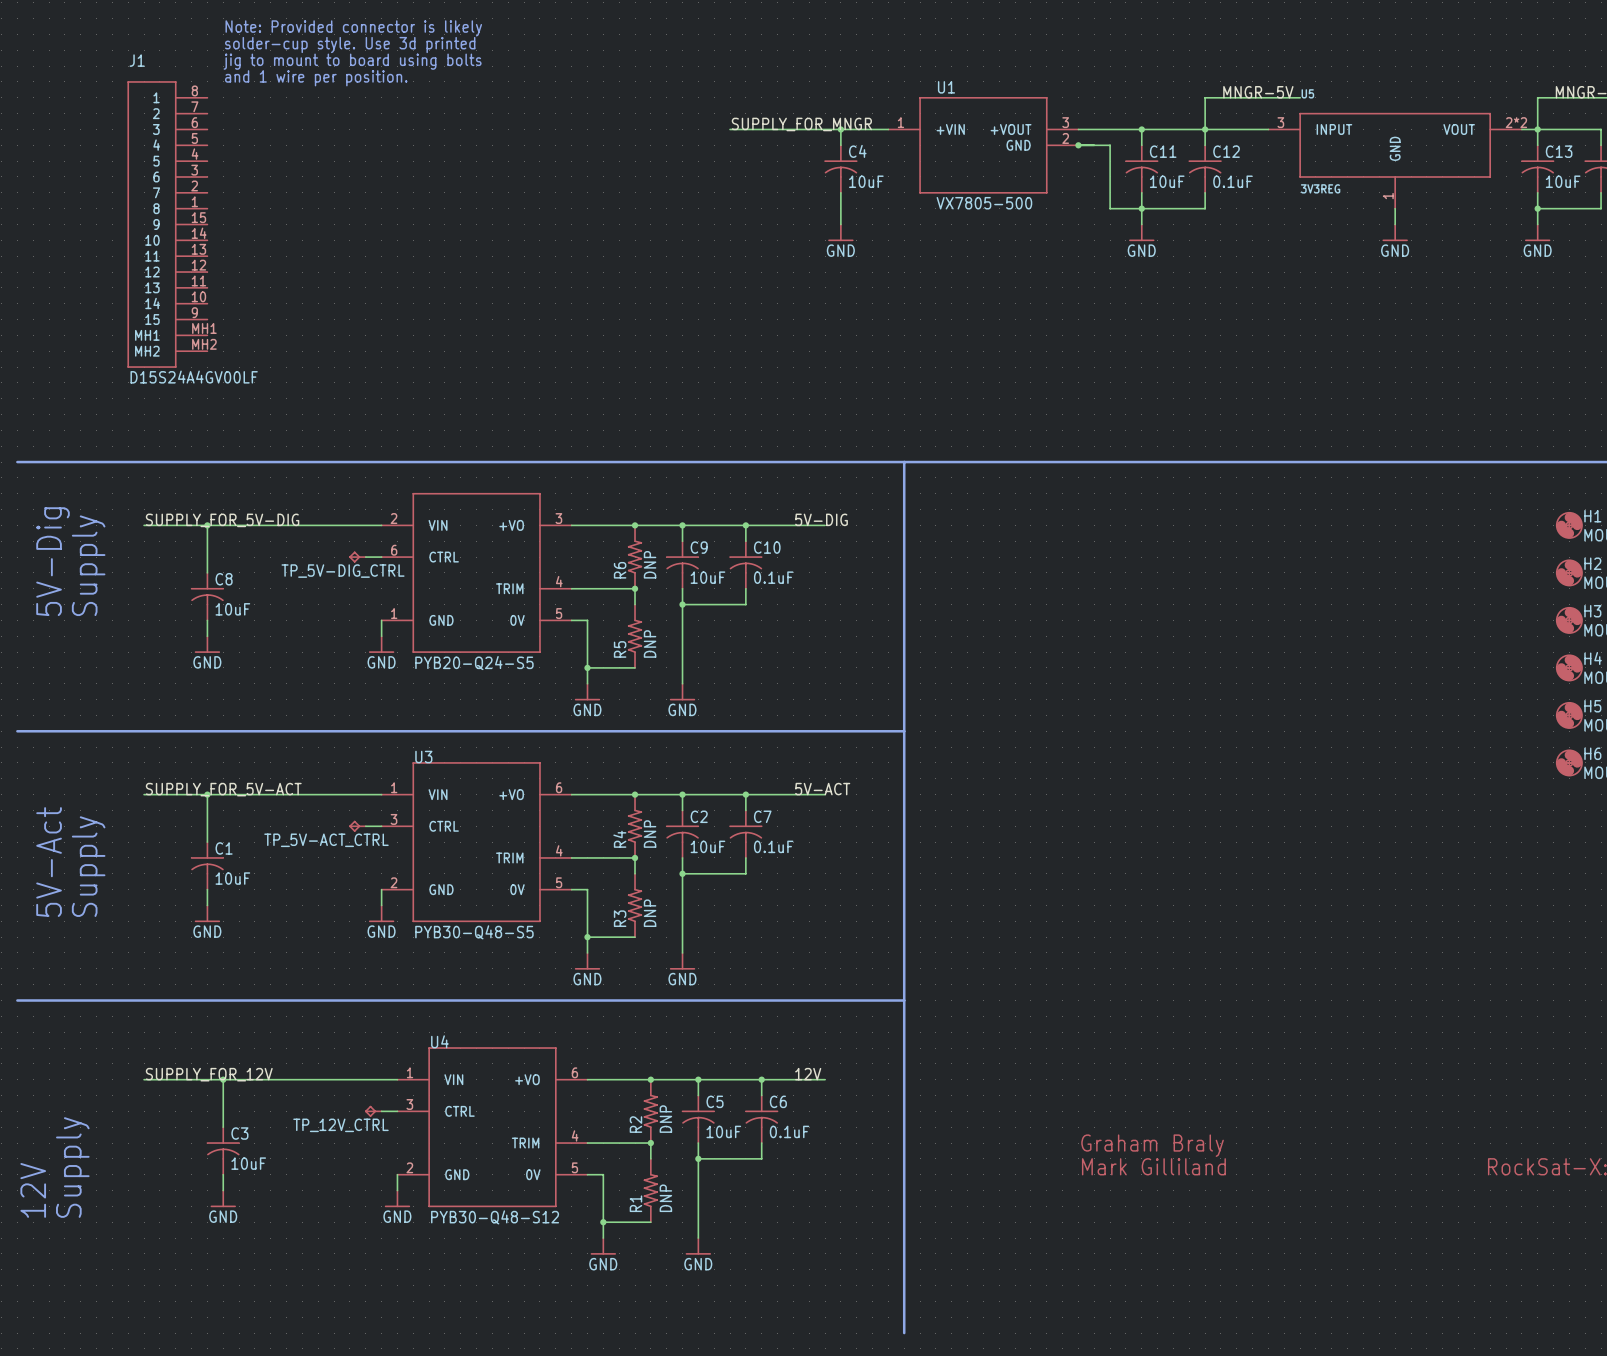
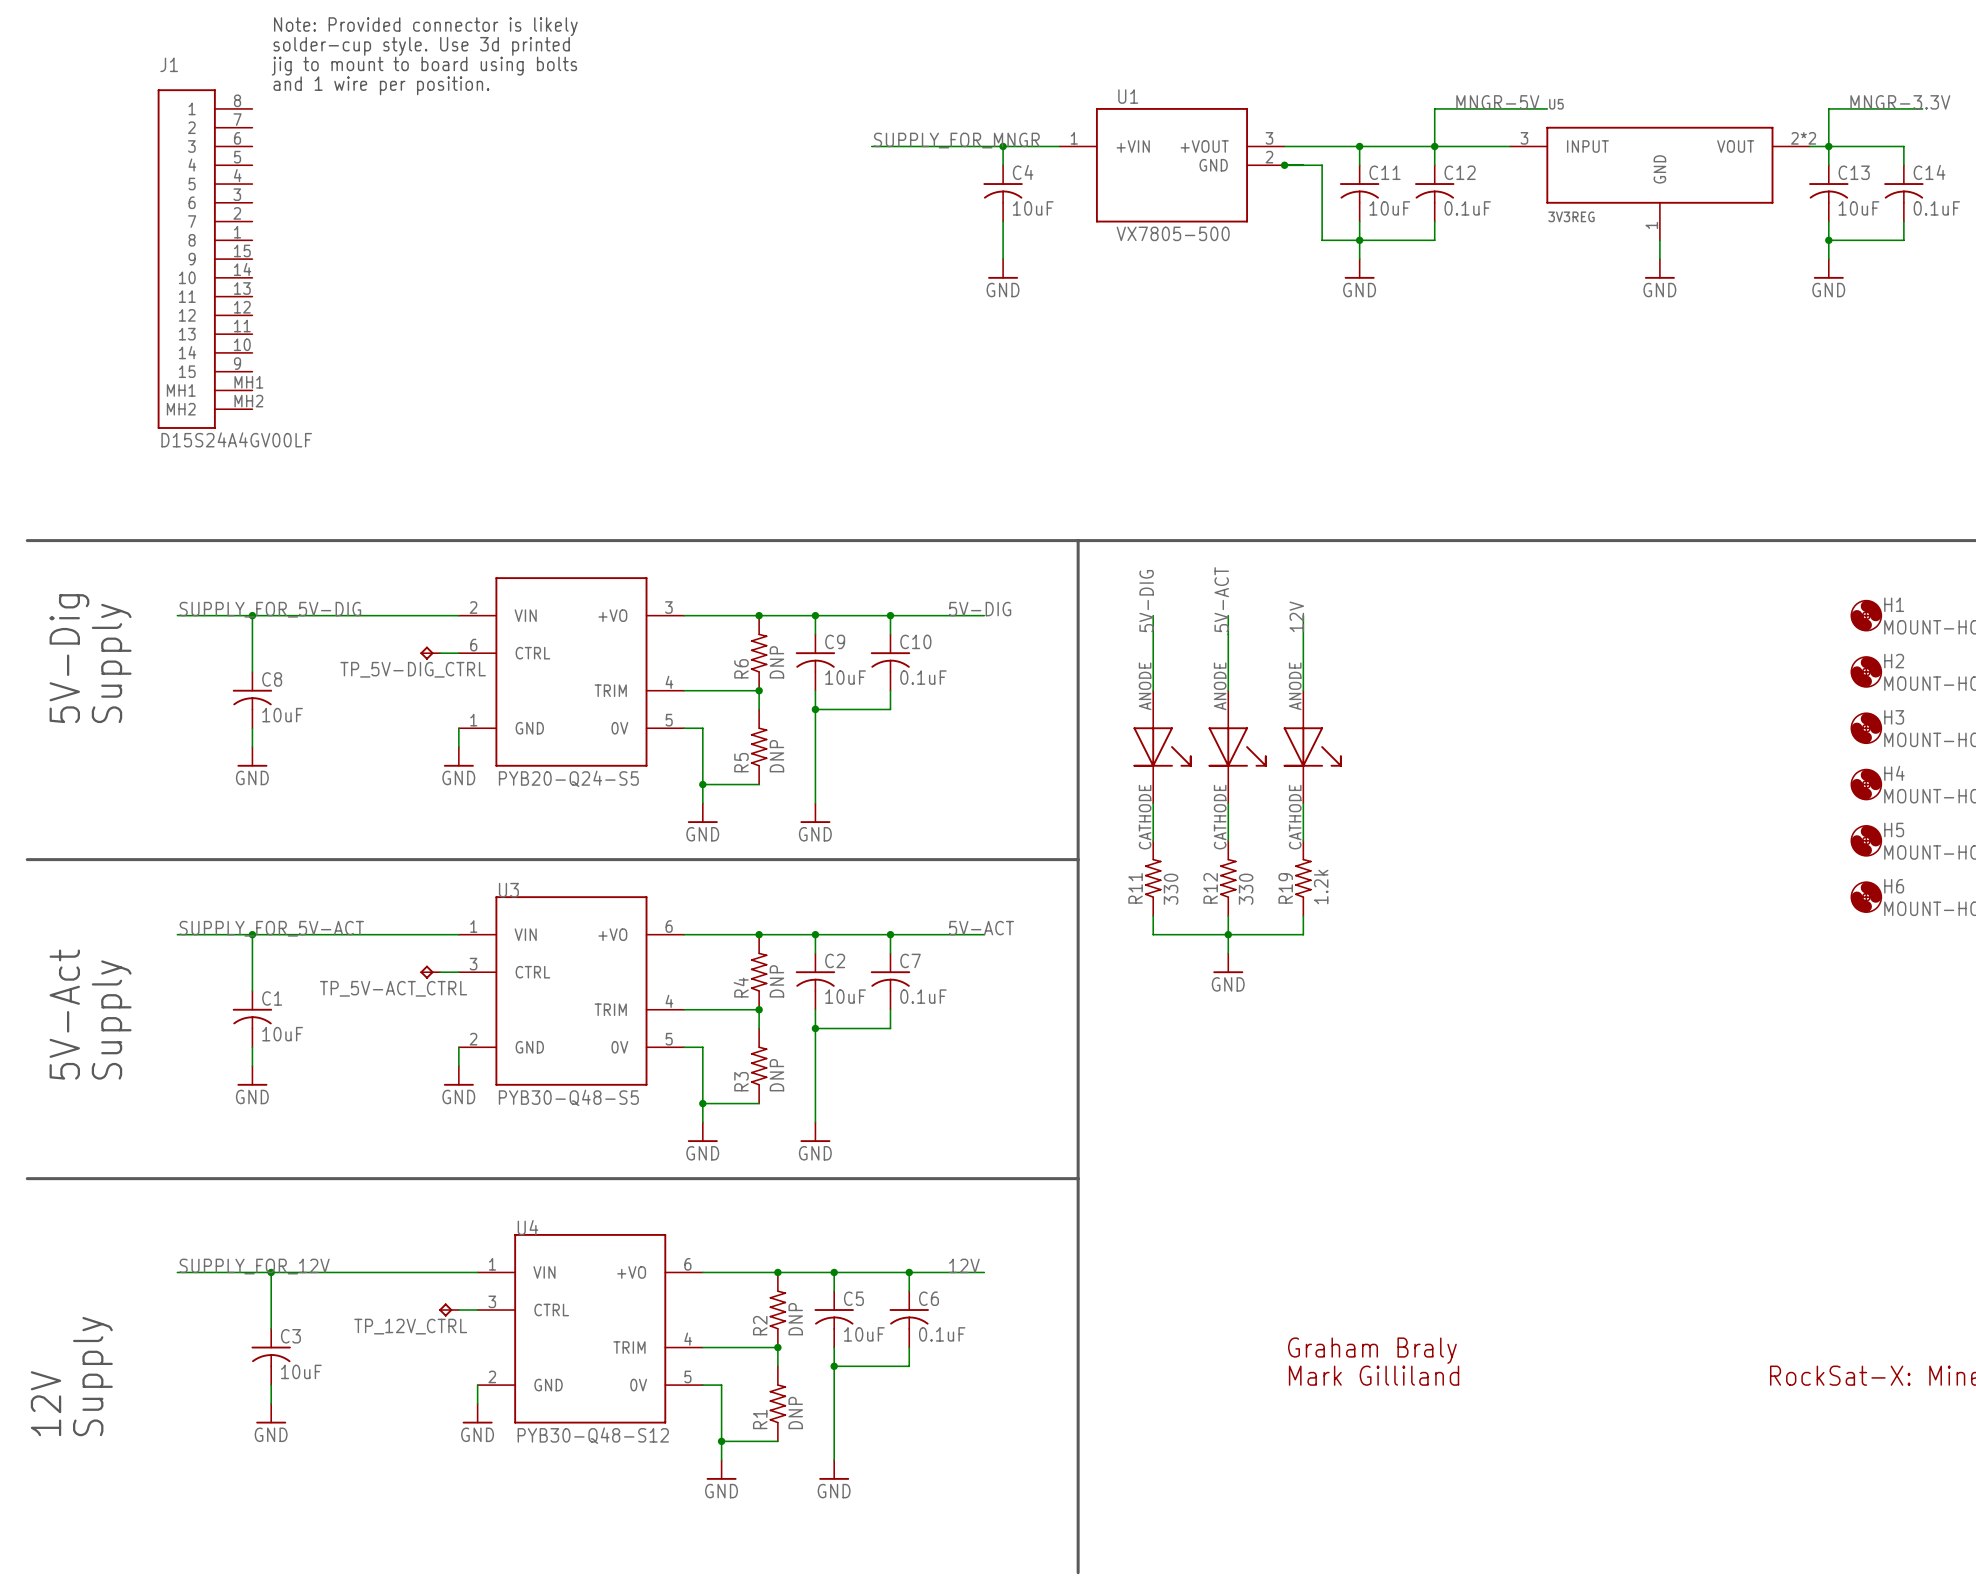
label: none -> 5V-ACT (1221, 599)
label: none -> 5V-DIG (1146, 601)
wire: none -> (1153, 615) (1153, 690)
wire: none -> (1228, 615) (1228, 690)
wire: none -> (1303, 615) (1303, 690)
label: none -> 12V (1296, 616)
part: none -> (1162, 747)
part: none -> (1237, 747)
part: none -> (1312, 747)
wire: none -> (1153, 803) (1153, 840)
wire: none -> (1228, 803) (1228, 840)
wire: none -> (1303, 803) (1303, 840)
R11: none -> 330 (1153, 878)
R12: none -> 330 (1228, 878)
R19: none -> 1.2k (1303, 878)
wire: none -> (1153, 915) (1153, 934) (1303, 934) (1303, 915)
wire: none -> (1228, 915) (1228, 953)
junction: none -> (1228, 934)
power symbol: none -> GND (1228, 963)

